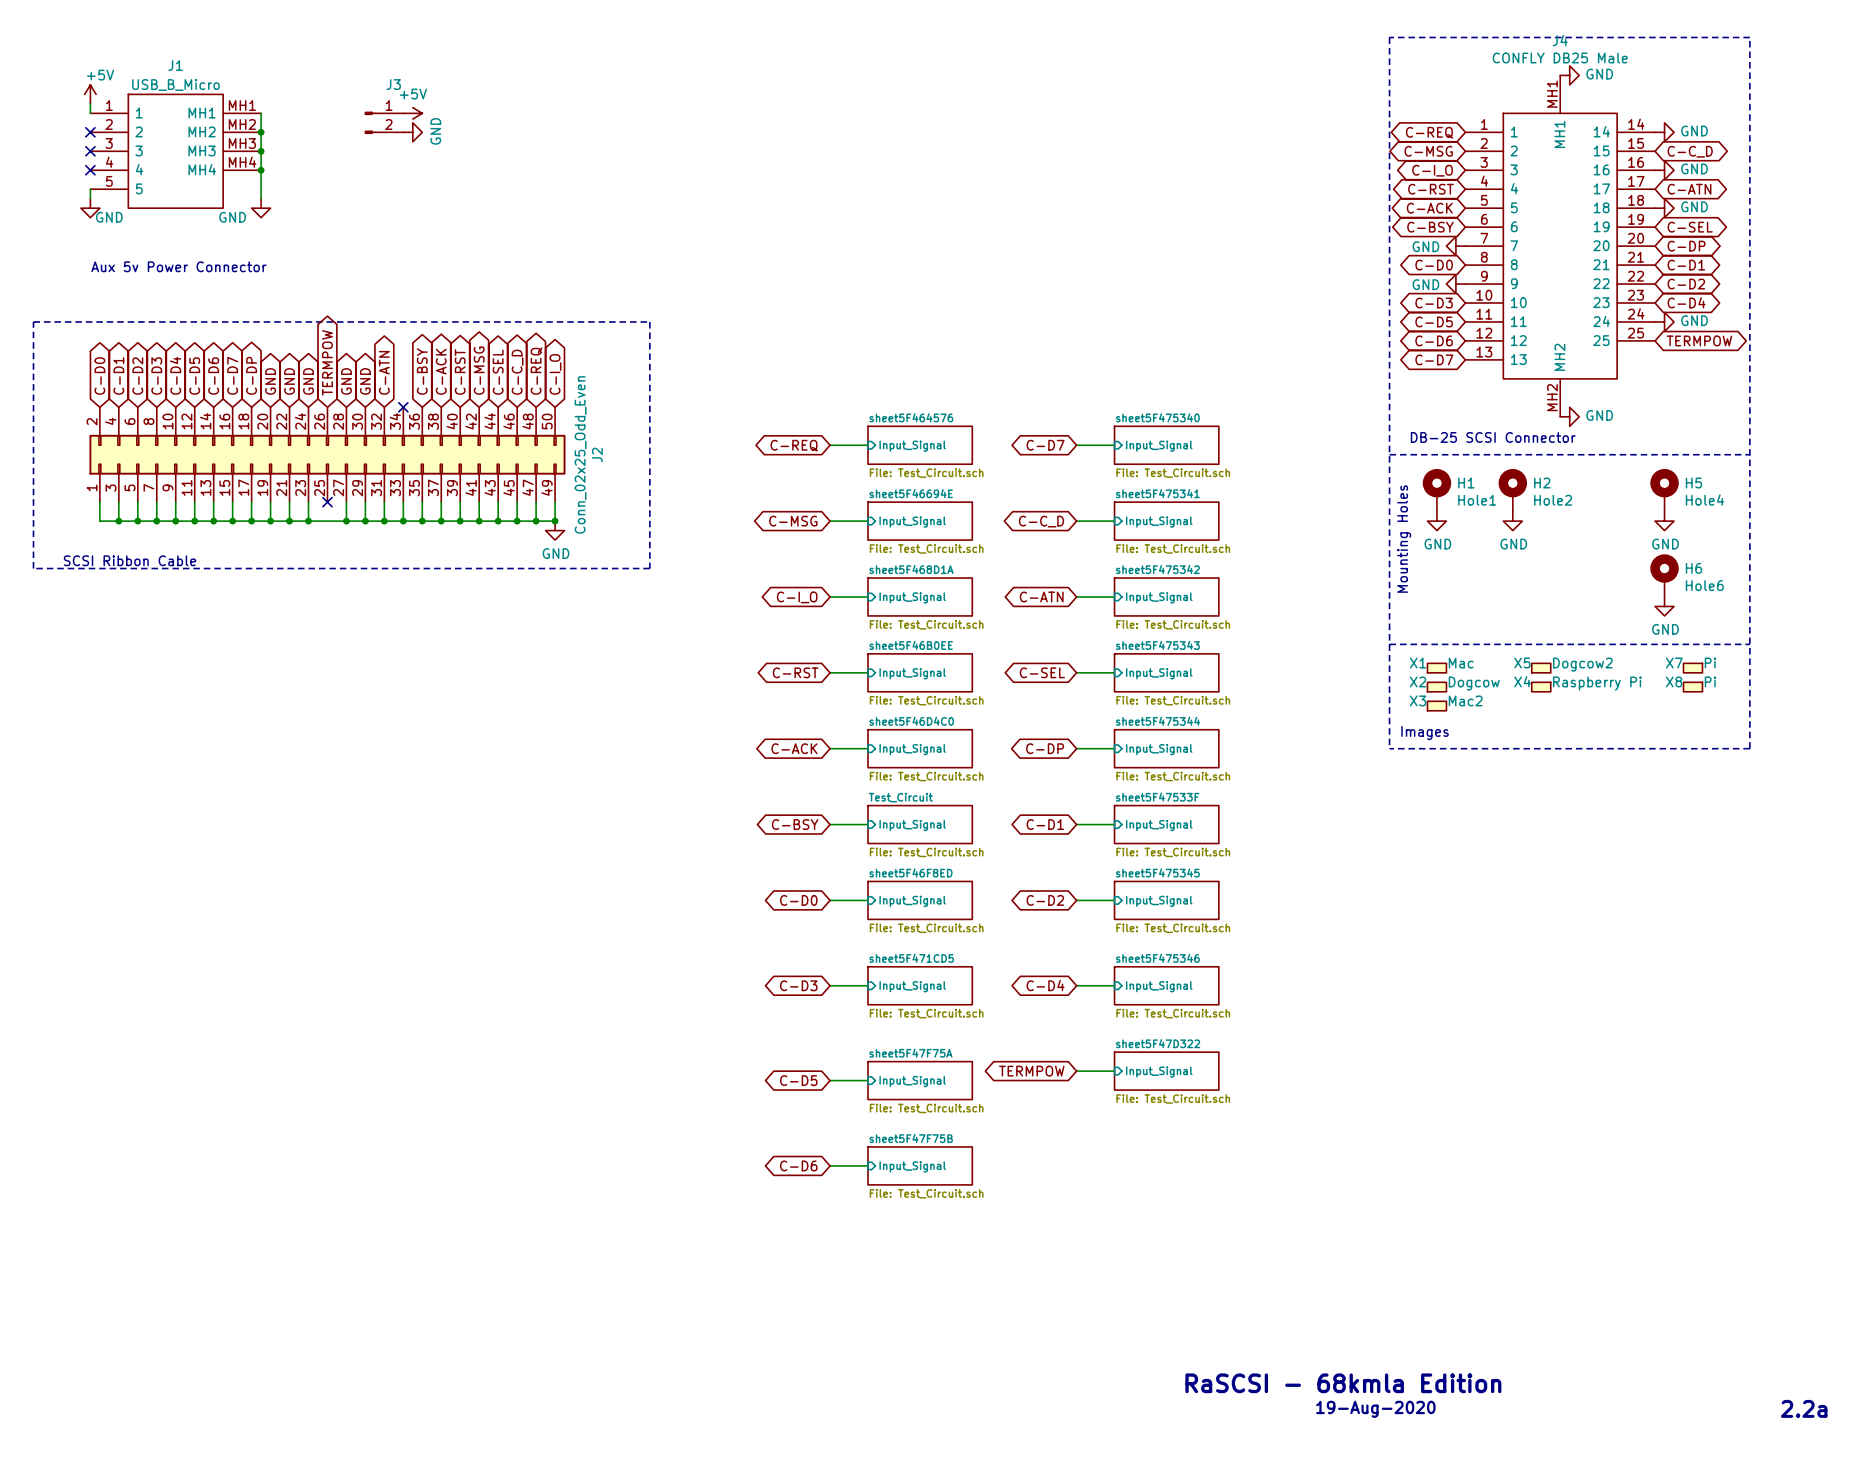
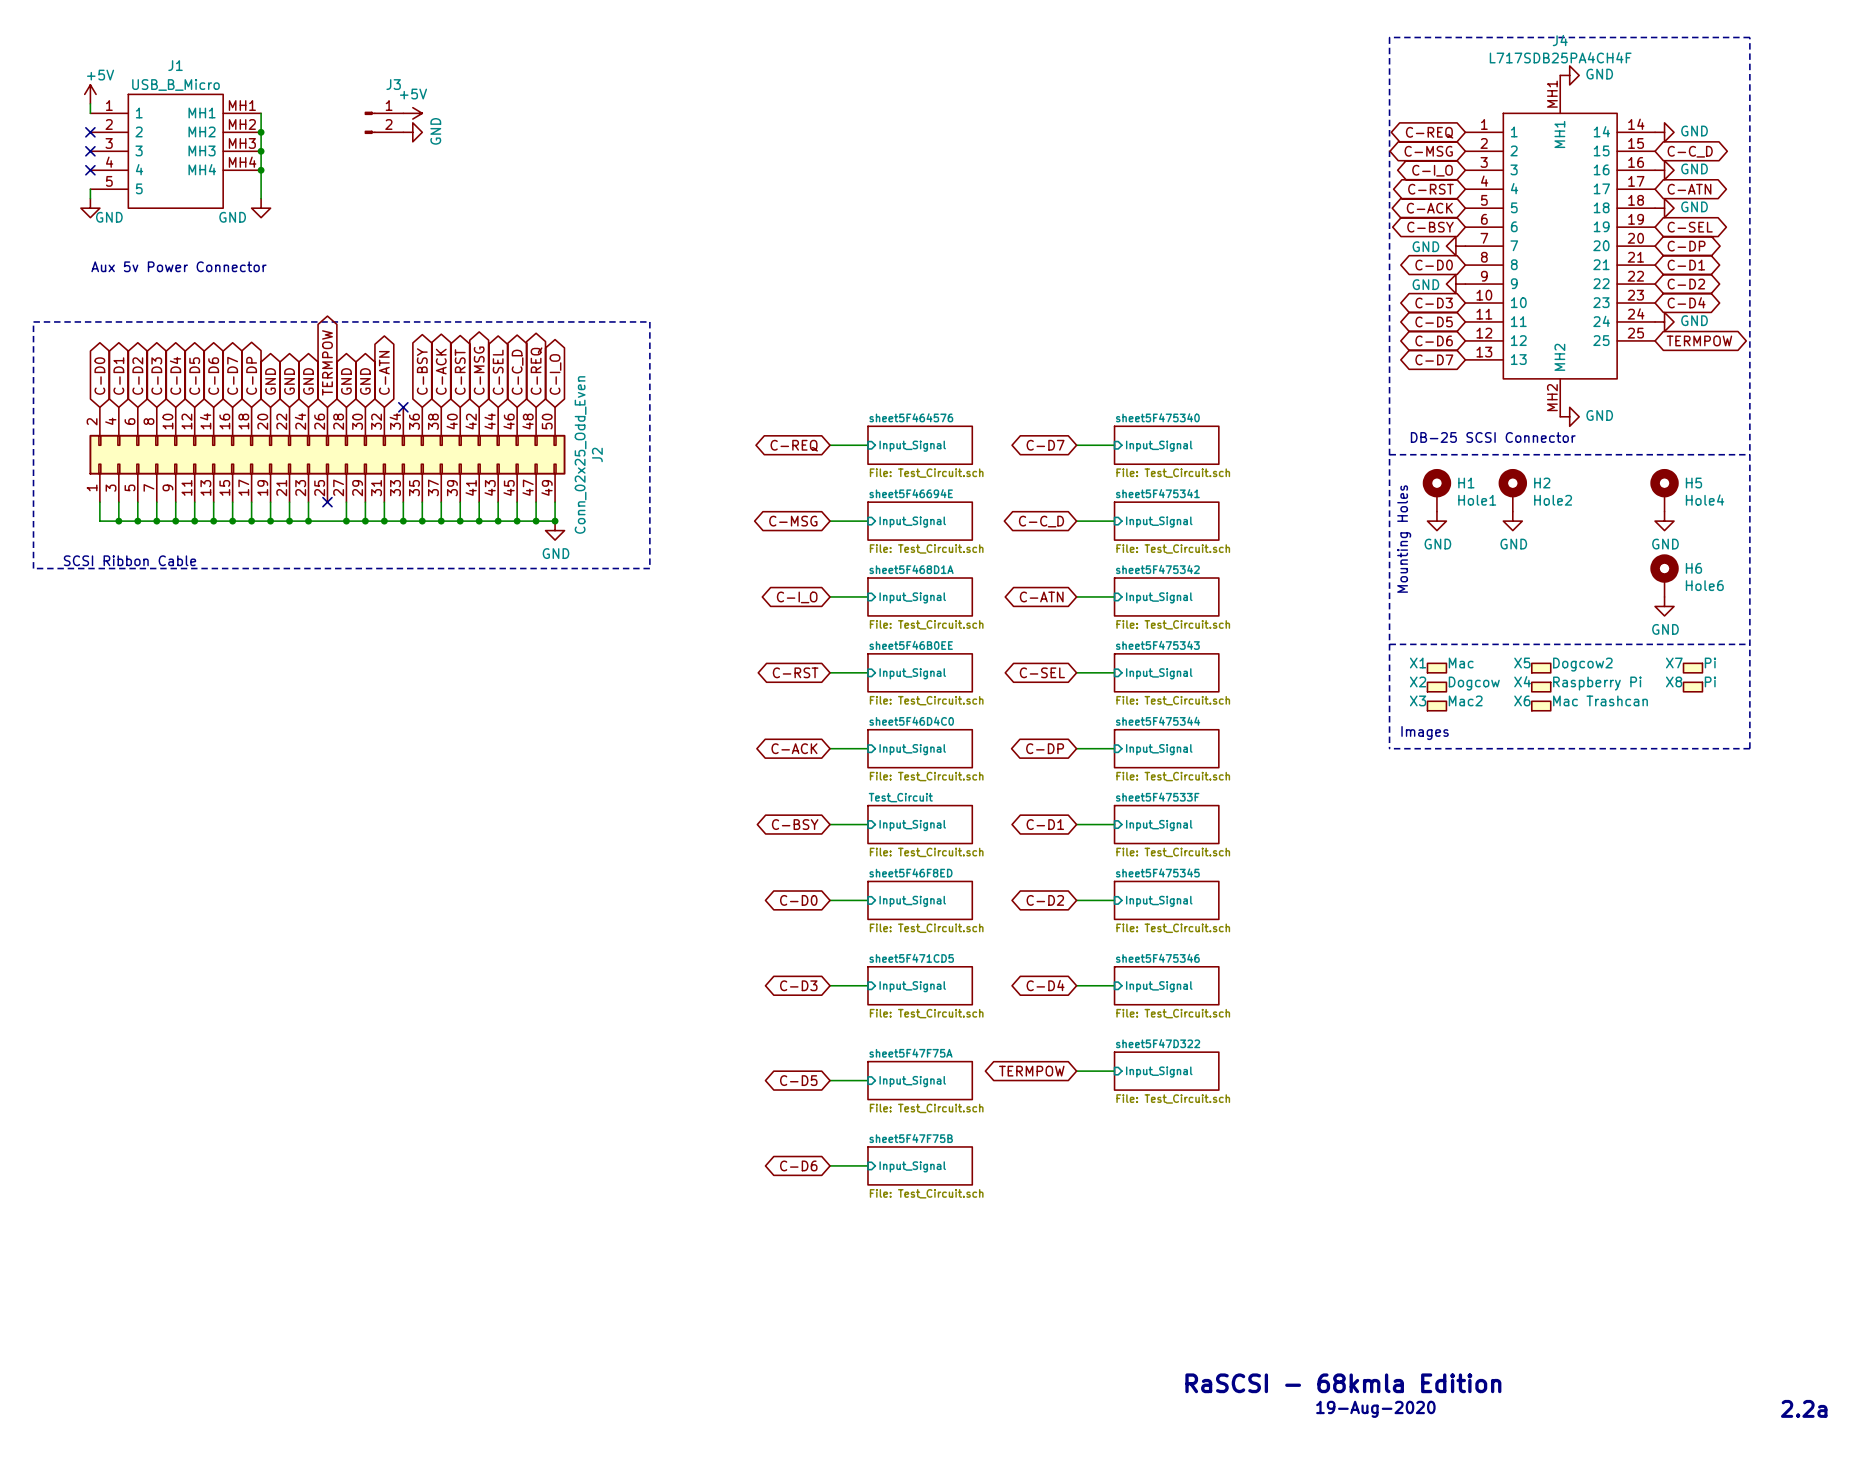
J4 value: CONFLY DB25 Male (1560, 58) -> L717SDB25PA4CH4F (1560, 57)
X6: none -> Mac Trashcan (1541, 706)

